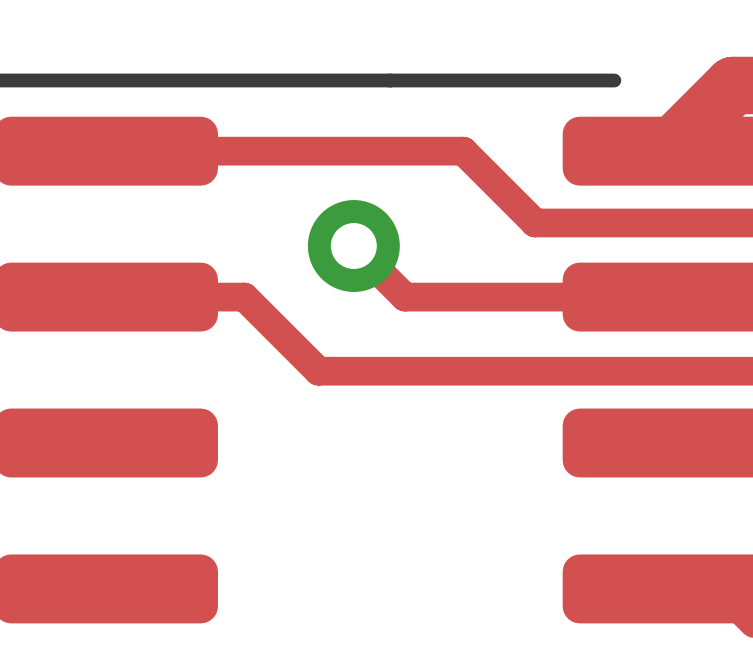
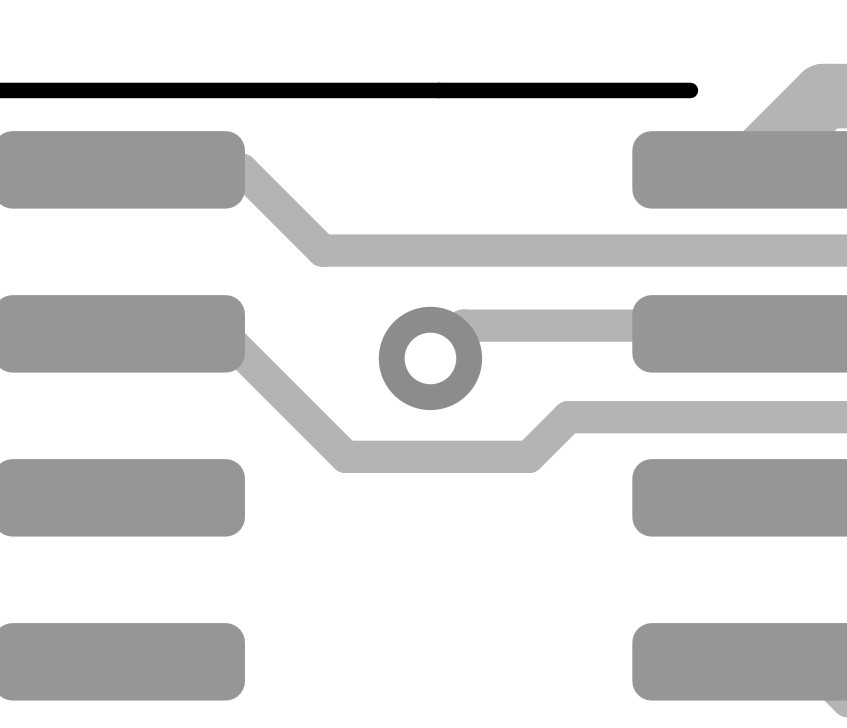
track: (215, 151) (463, 151) (535, 222) -> (241, 169) (322, 250) (601, 250)
track: (353, 246) (404, 297) (674, 297) -> (430, 358) (463, 325) (750, 325) (758, 333)
via position: (353, 246) -> (430, 358)
track: (198, 297) (244, 297) (318, 371) (505, 371) -> (222, 333) (345, 456) (528, 456) (568, 417)

